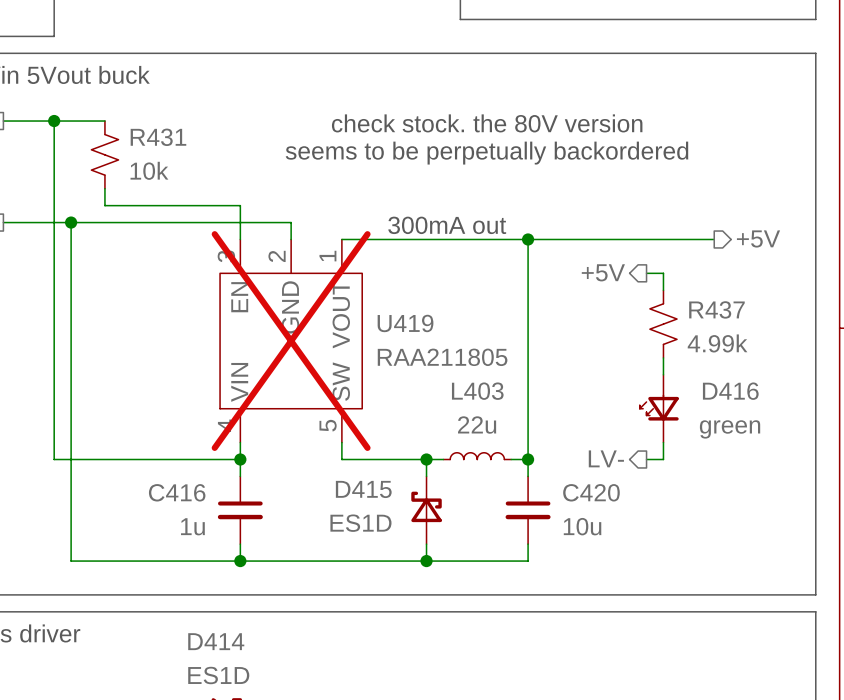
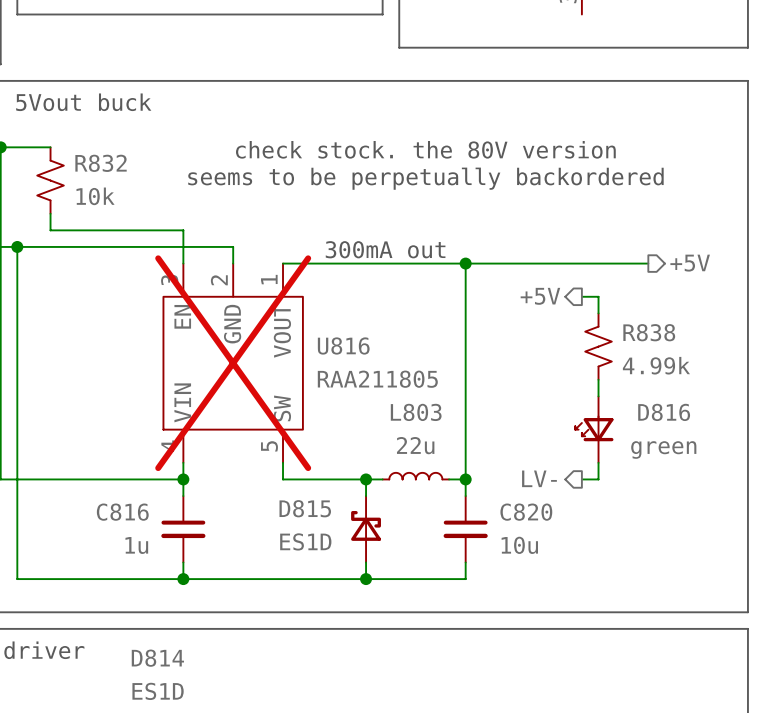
R431 name: R431 (158, 137) -> R832 (101, 163)
R437 name: R437 (716, 309) -> R838 (649, 332)
U419 name: U419 (405, 323) -> U816 (343, 345)
L403 name: L403 (477, 391) -> L803 (416, 412)
D416 name: D416 (730, 391) -> D816 (664, 412)
D415 name: D415 (363, 489) -> D815 (305, 508)
C416 name: C416 (177, 492) -> C816 (122, 512)
C420 name: C420 (591, 492) -> C820 (526, 512)
D414 name: D414 (216, 641) -> D814 (157, 658)

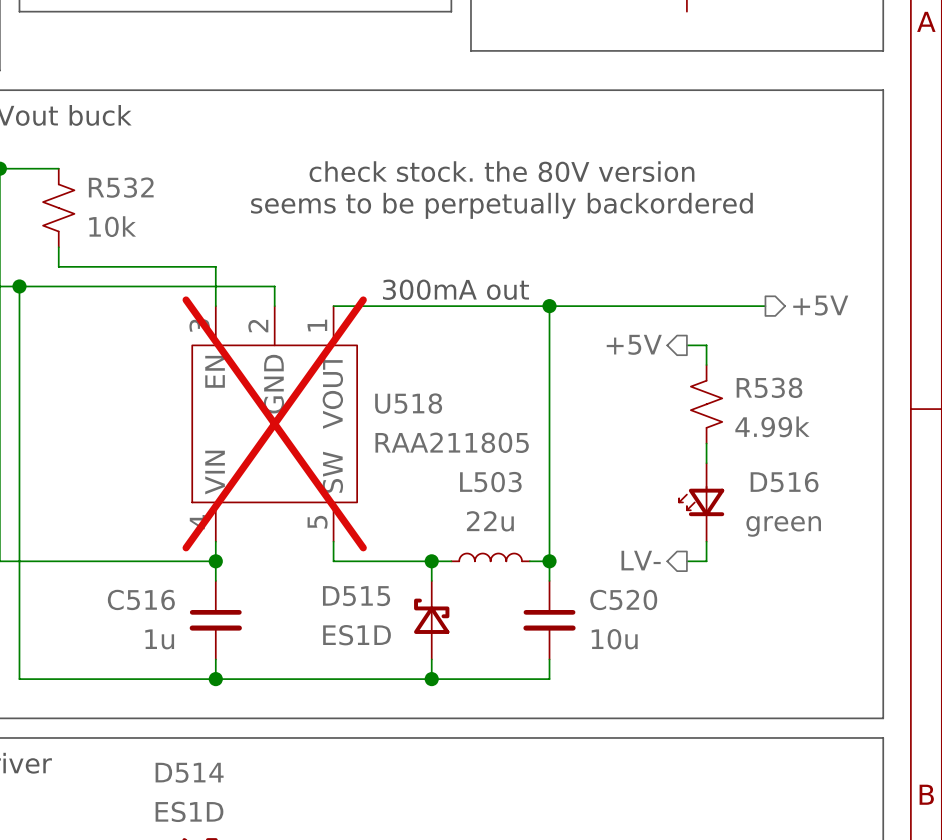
R832 name: R832 (101, 163) -> R532 (121, 187)
R838 name: R838 (649, 332) -> R538 (769, 387)
U816 name: U816 (343, 345) -> U518 (408, 403)
L803 name: L803 (416, 412) -> L503 (490, 482)
D816 name: D816 (664, 412) -> D516 (784, 482)
D815 name: D815 (305, 508) -> D515 (356, 596)
C816 name: C816 (122, 512) -> C516 (141, 599)
C820 name: C820 (526, 512) -> C520 (623, 599)
D814 name: D814 (157, 658) -> D514 (189, 772)

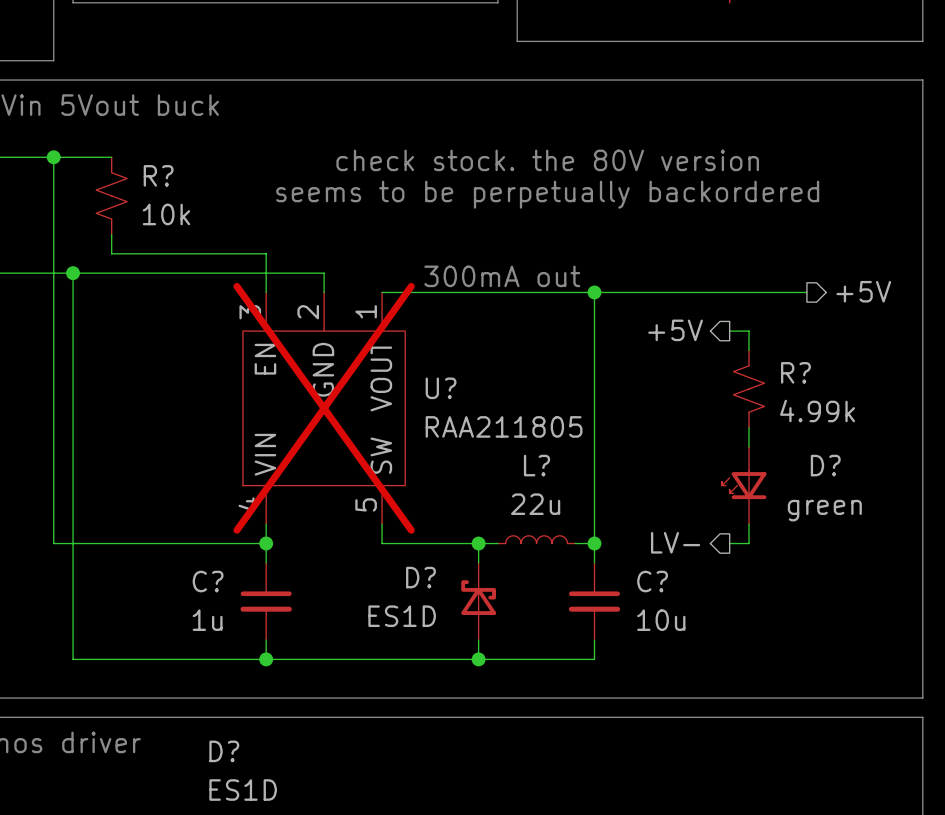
R532 name: R532 (121, 187) -> R? (158, 175)
R538 name: R538 (769, 387) -> R? (795, 372)
U518 name: U518 (408, 403) -> U? (441, 388)
L503 name: L503 (490, 482) -> L? (537, 465)
D516 name: D516 (784, 482) -> D? (825, 465)
D515 name: D515 (356, 596) -> D? (420, 577)
C516 name: C516 (141, 599) -> C? (208, 581)
C520 name: C520 (623, 599) -> C? (652, 581)
D514 name: D514 (189, 772) -> D? (224, 751)

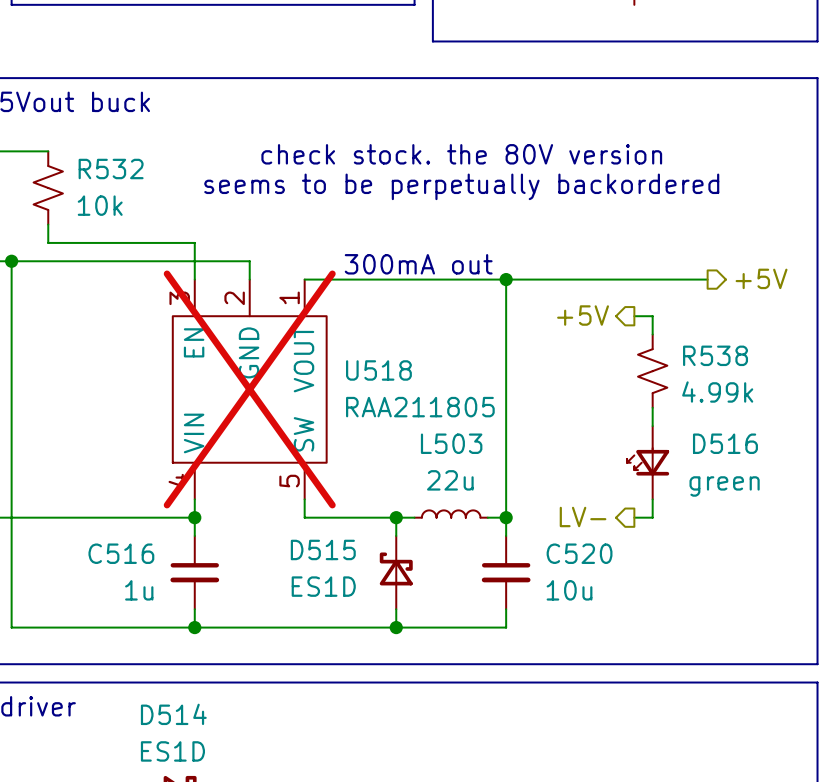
R? name: R? (158, 175) -> R532 (111, 168)
R? name: R? (795, 372) -> R538 (715, 355)
U? name: U? (441, 388) -> U518 (378, 370)
L? name: L? (537, 465) -> L503 (451, 443)
D? name: D? (825, 465) -> D516 (725, 443)
D? name: D? (420, 577) -> D515 (323, 549)
C? name: C? (208, 581) -> C516 (121, 553)
C? name: C? (652, 581) -> C520 (579, 553)
D? name: D? (224, 751) -> D514 (173, 714)

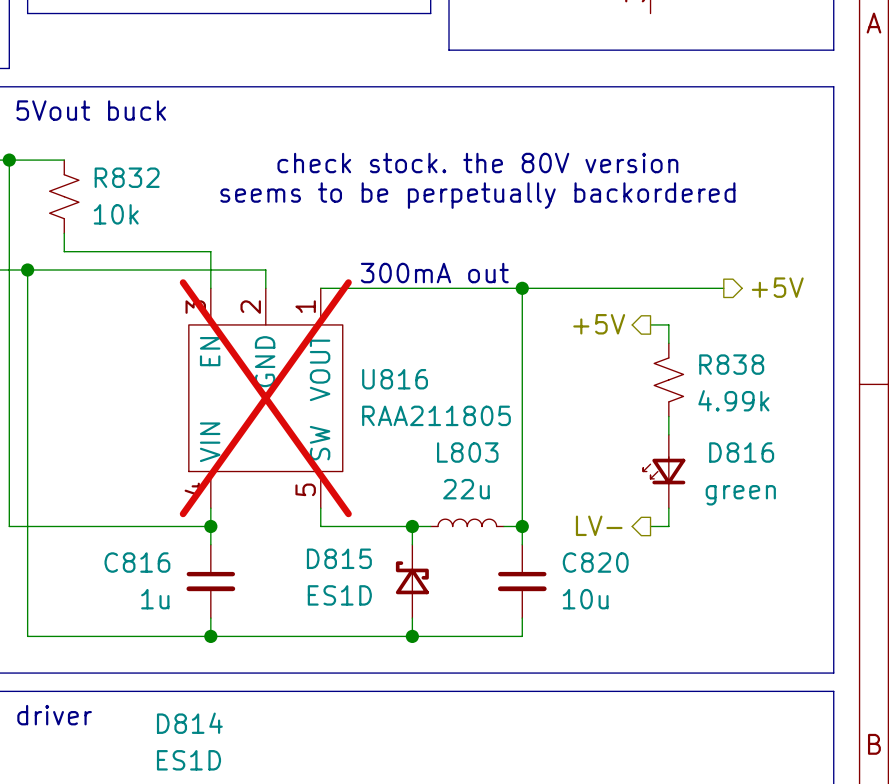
R532 name: R532 (111, 168) -> R832 (127, 177)
R538 name: R538 (715, 355) -> R838 (731, 364)
U518 name: U518 (378, 370) -> U816 (395, 379)
L503 name: L503 (451, 443) -> L803 (467, 452)
D516 name: D516 (725, 443) -> D816 (741, 452)
D515 name: D515 (323, 549) -> D815 (339, 558)
C516 name: C516 (121, 553) -> C816 (137, 562)
C520 name: C520 (579, 553) -> C820 (595, 562)
D514 name: D514 (173, 714) -> D814 (189, 723)

